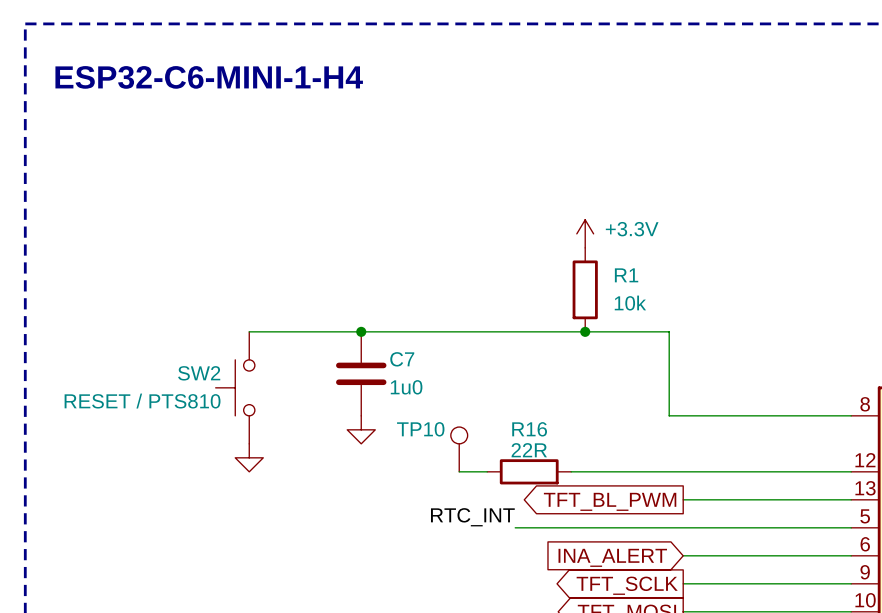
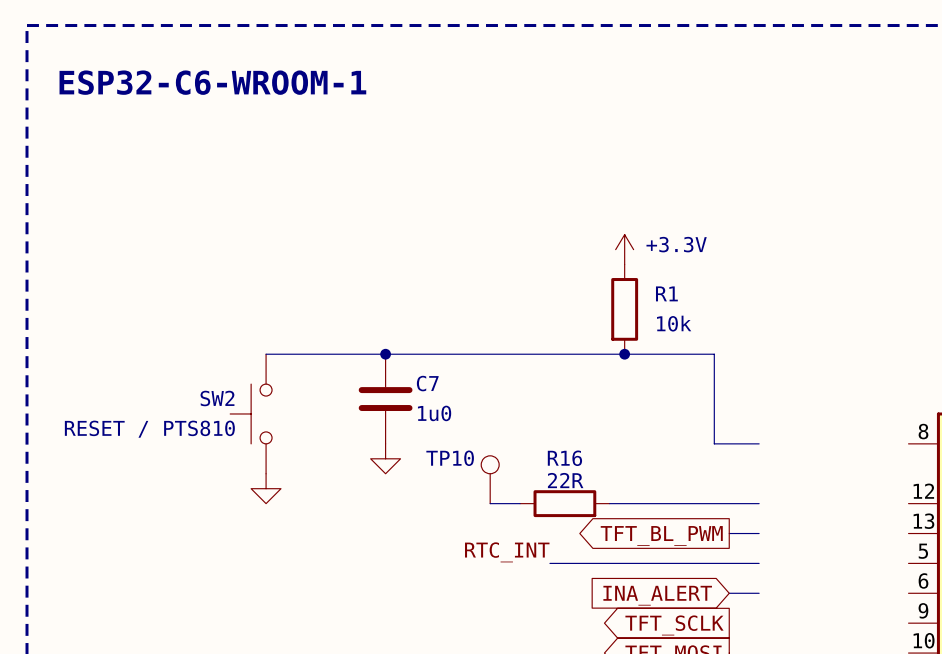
text: ESP32-C6-MINI-1-H4 (209, 77) -> ESP32-C6-WROOM-1 (212, 82)
wire: (711, 415) (851, 415) -> none
wire: (711, 471) (851, 471) -> none
wire: (711, 499) (851, 499) -> none
wire: (711, 527) (851, 527) -> none
wire: (711, 555) (851, 555) -> none
wire: (683, 583) (851, 583) -> none
wire: (683, 611) (851, 611) -> none

